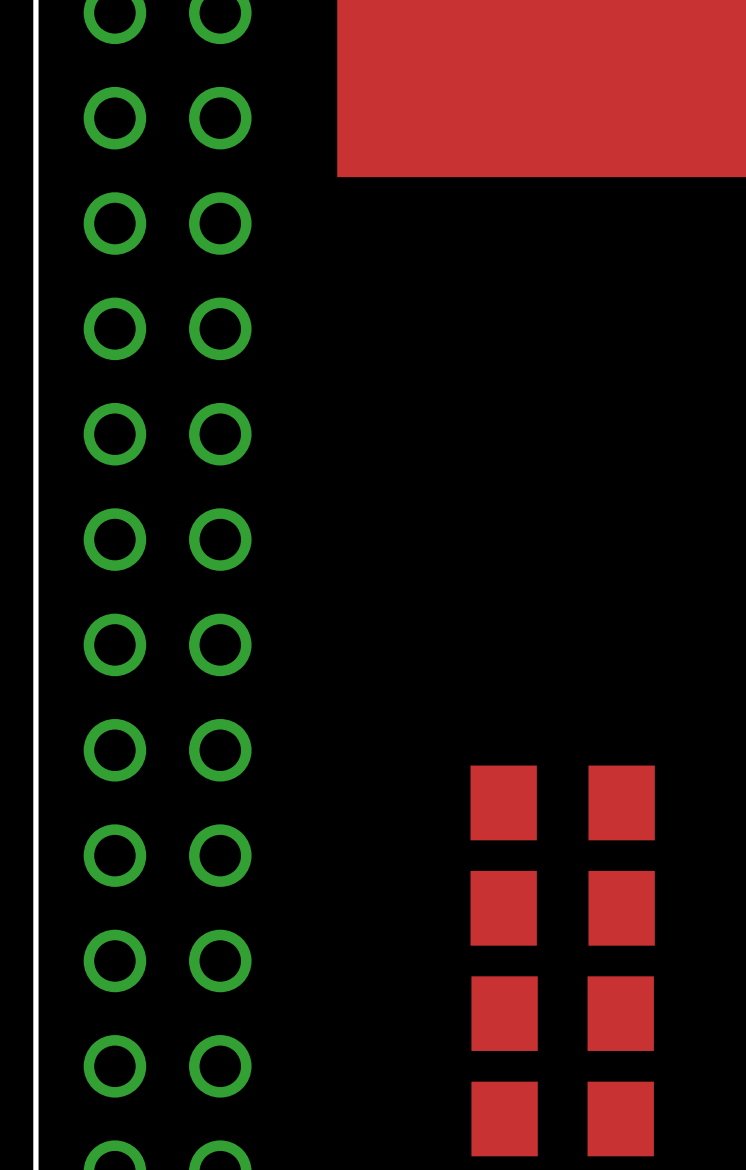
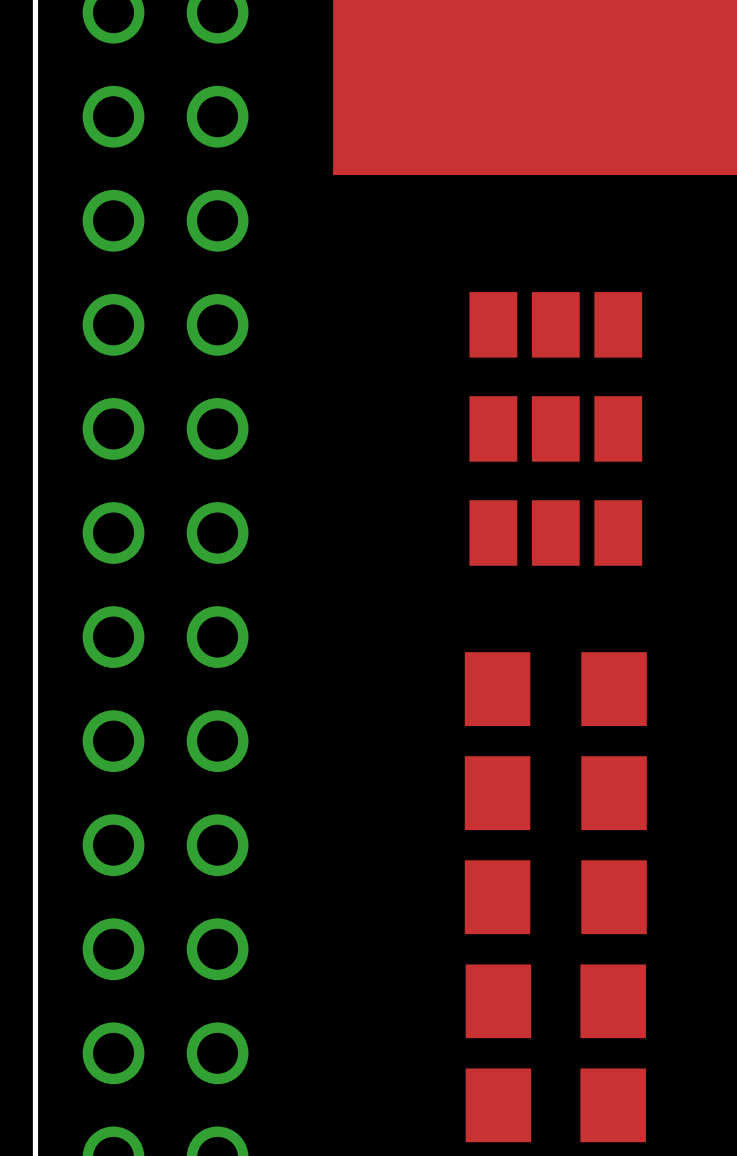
part: none -> (555, 324)
part: none -> (555, 428)
part: none -> (555, 532)
part: none -> (555, 689)

